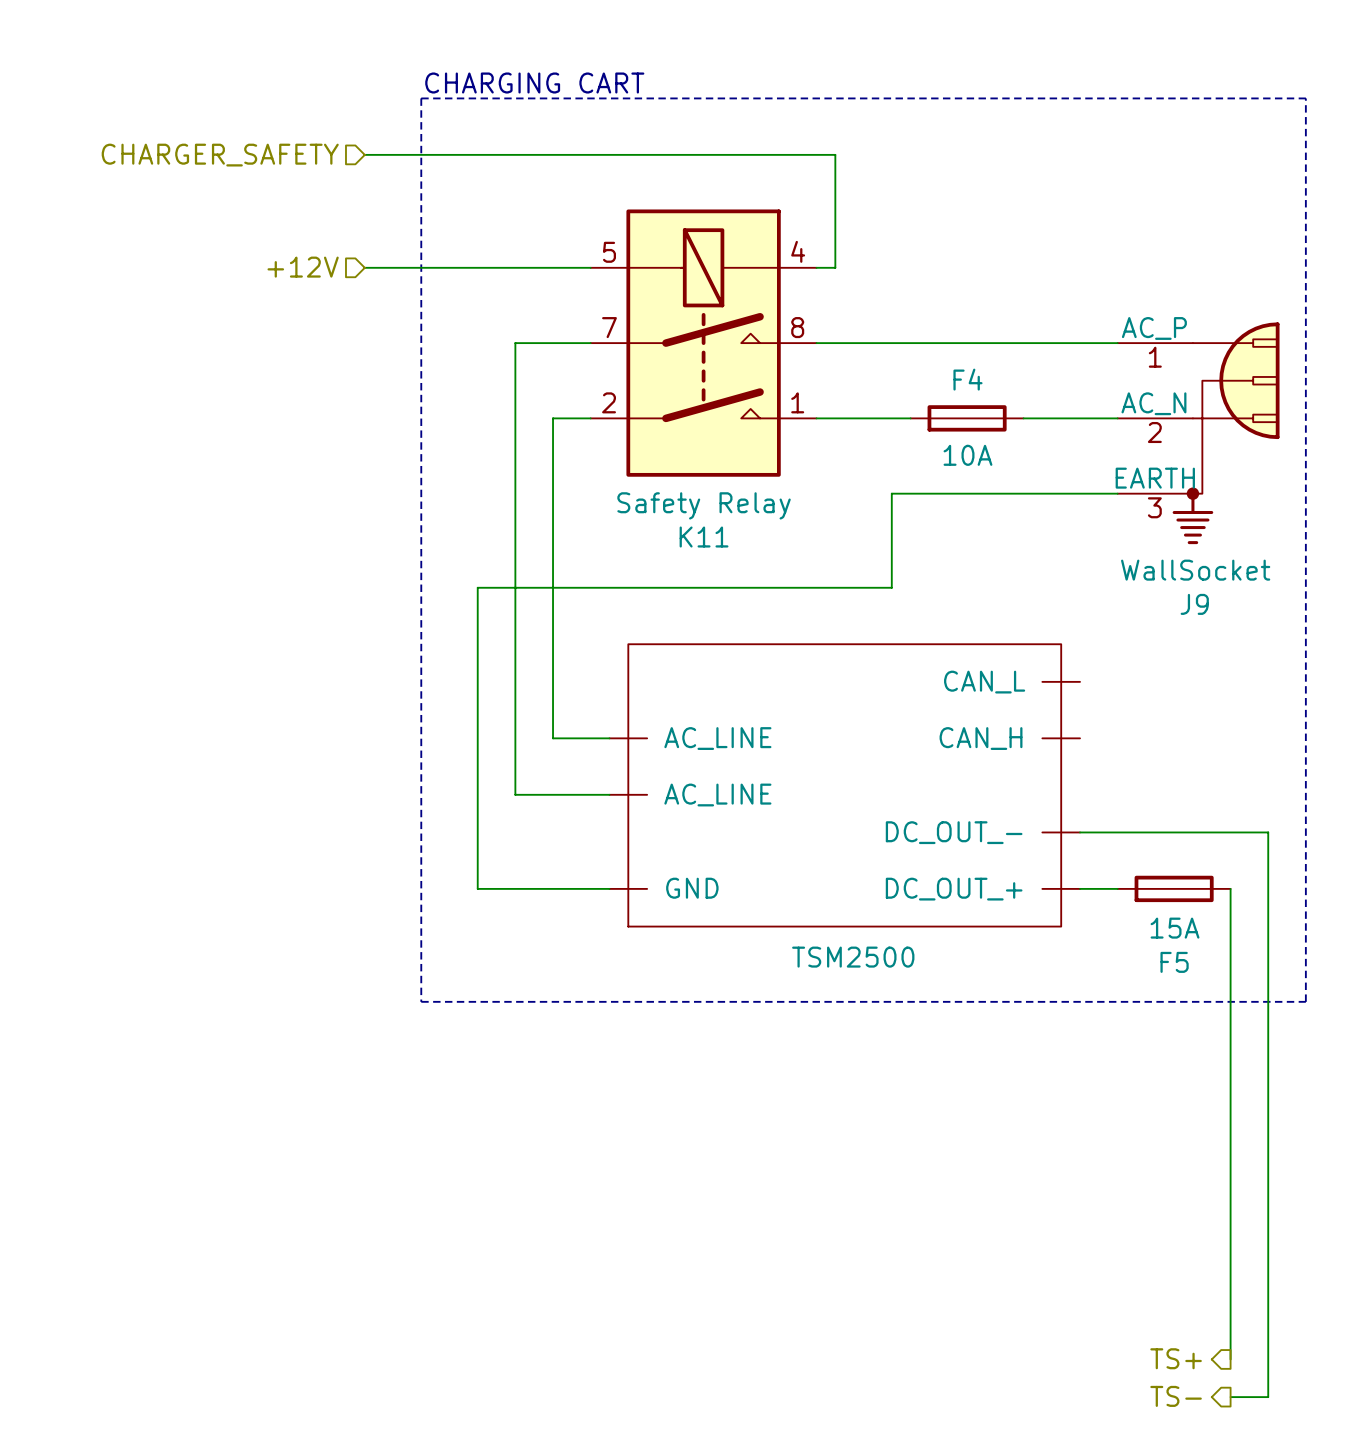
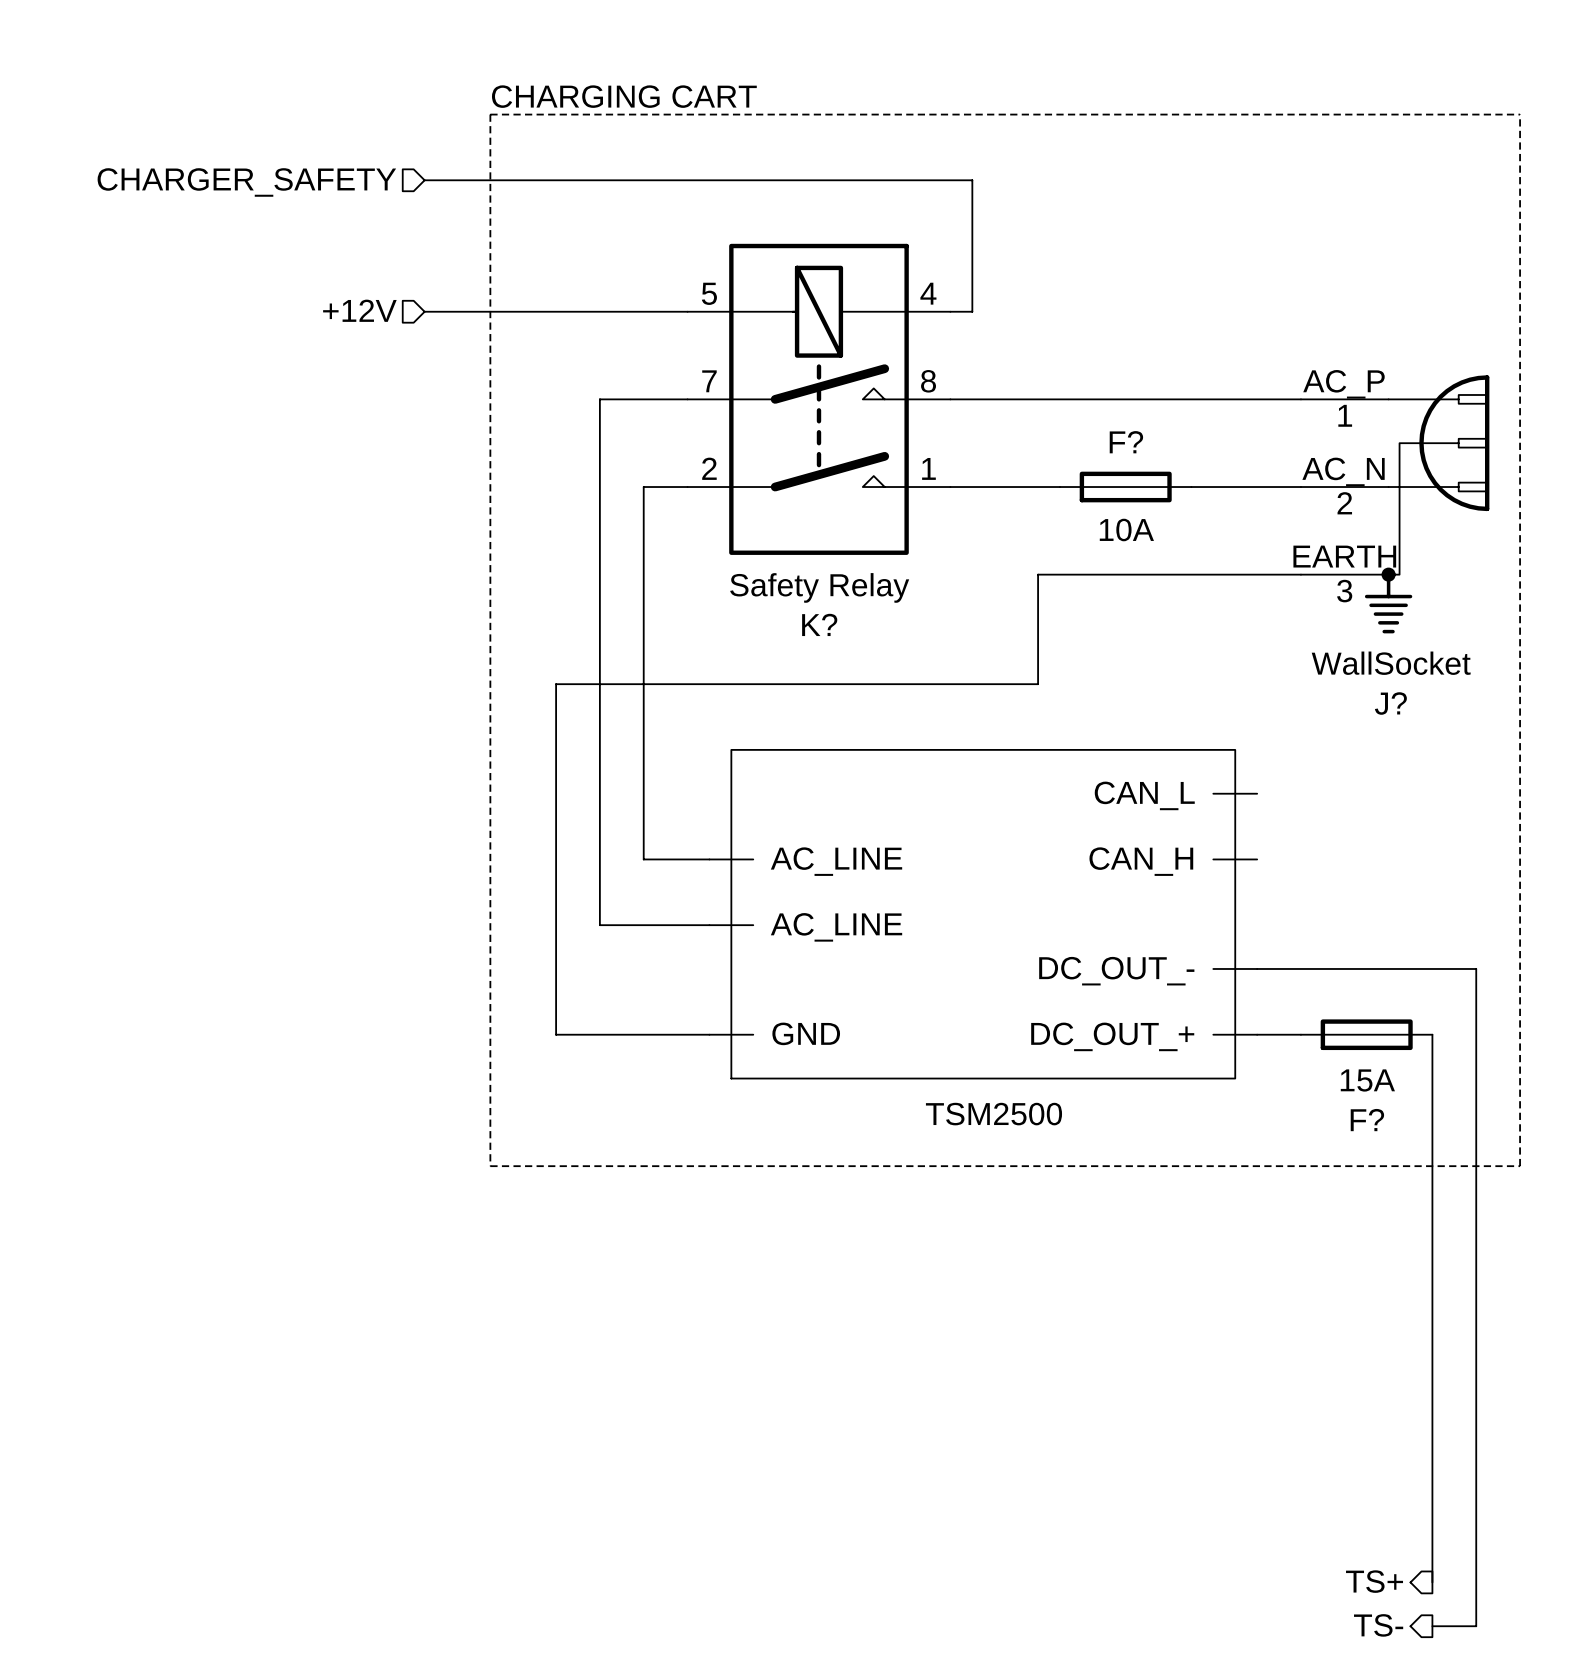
F4 name: F4 (967, 379) -> F? (1126, 442)
K11 name: K11 (704, 537) -> K? (819, 624)
J9 name: J9 (1194, 604) -> J? (1390, 703)
F5 name: F5 (1174, 962) -> F? (1367, 1120)

